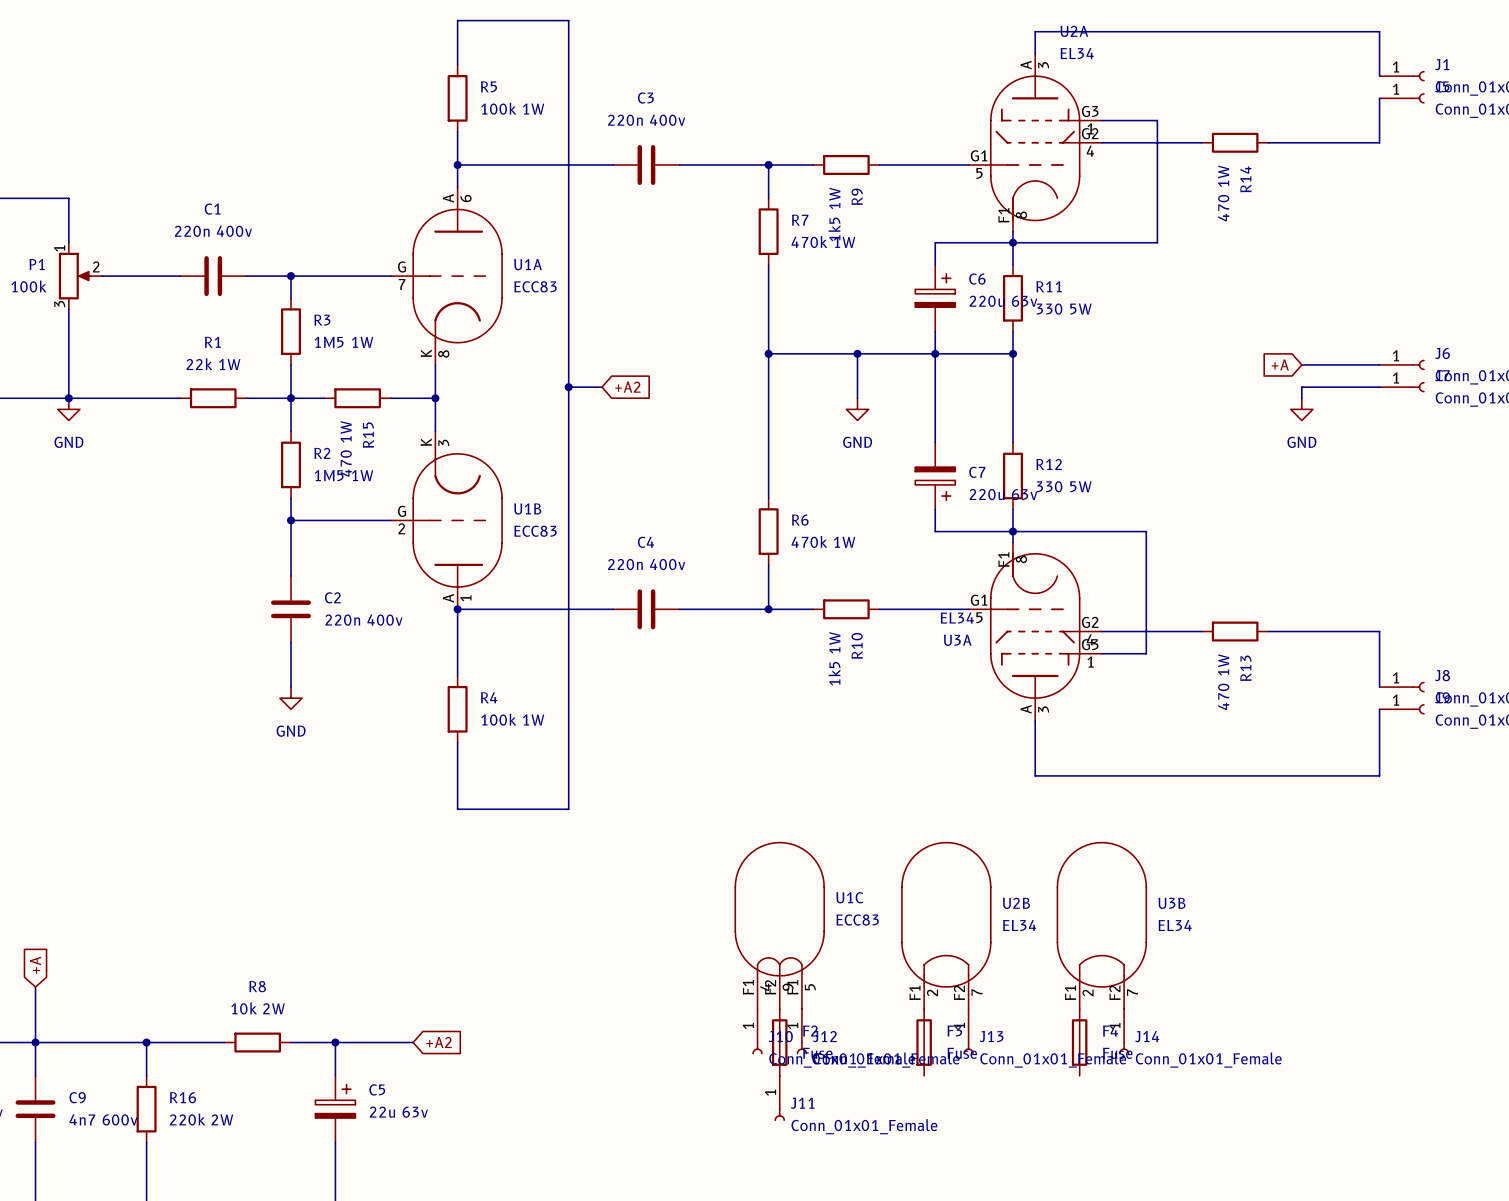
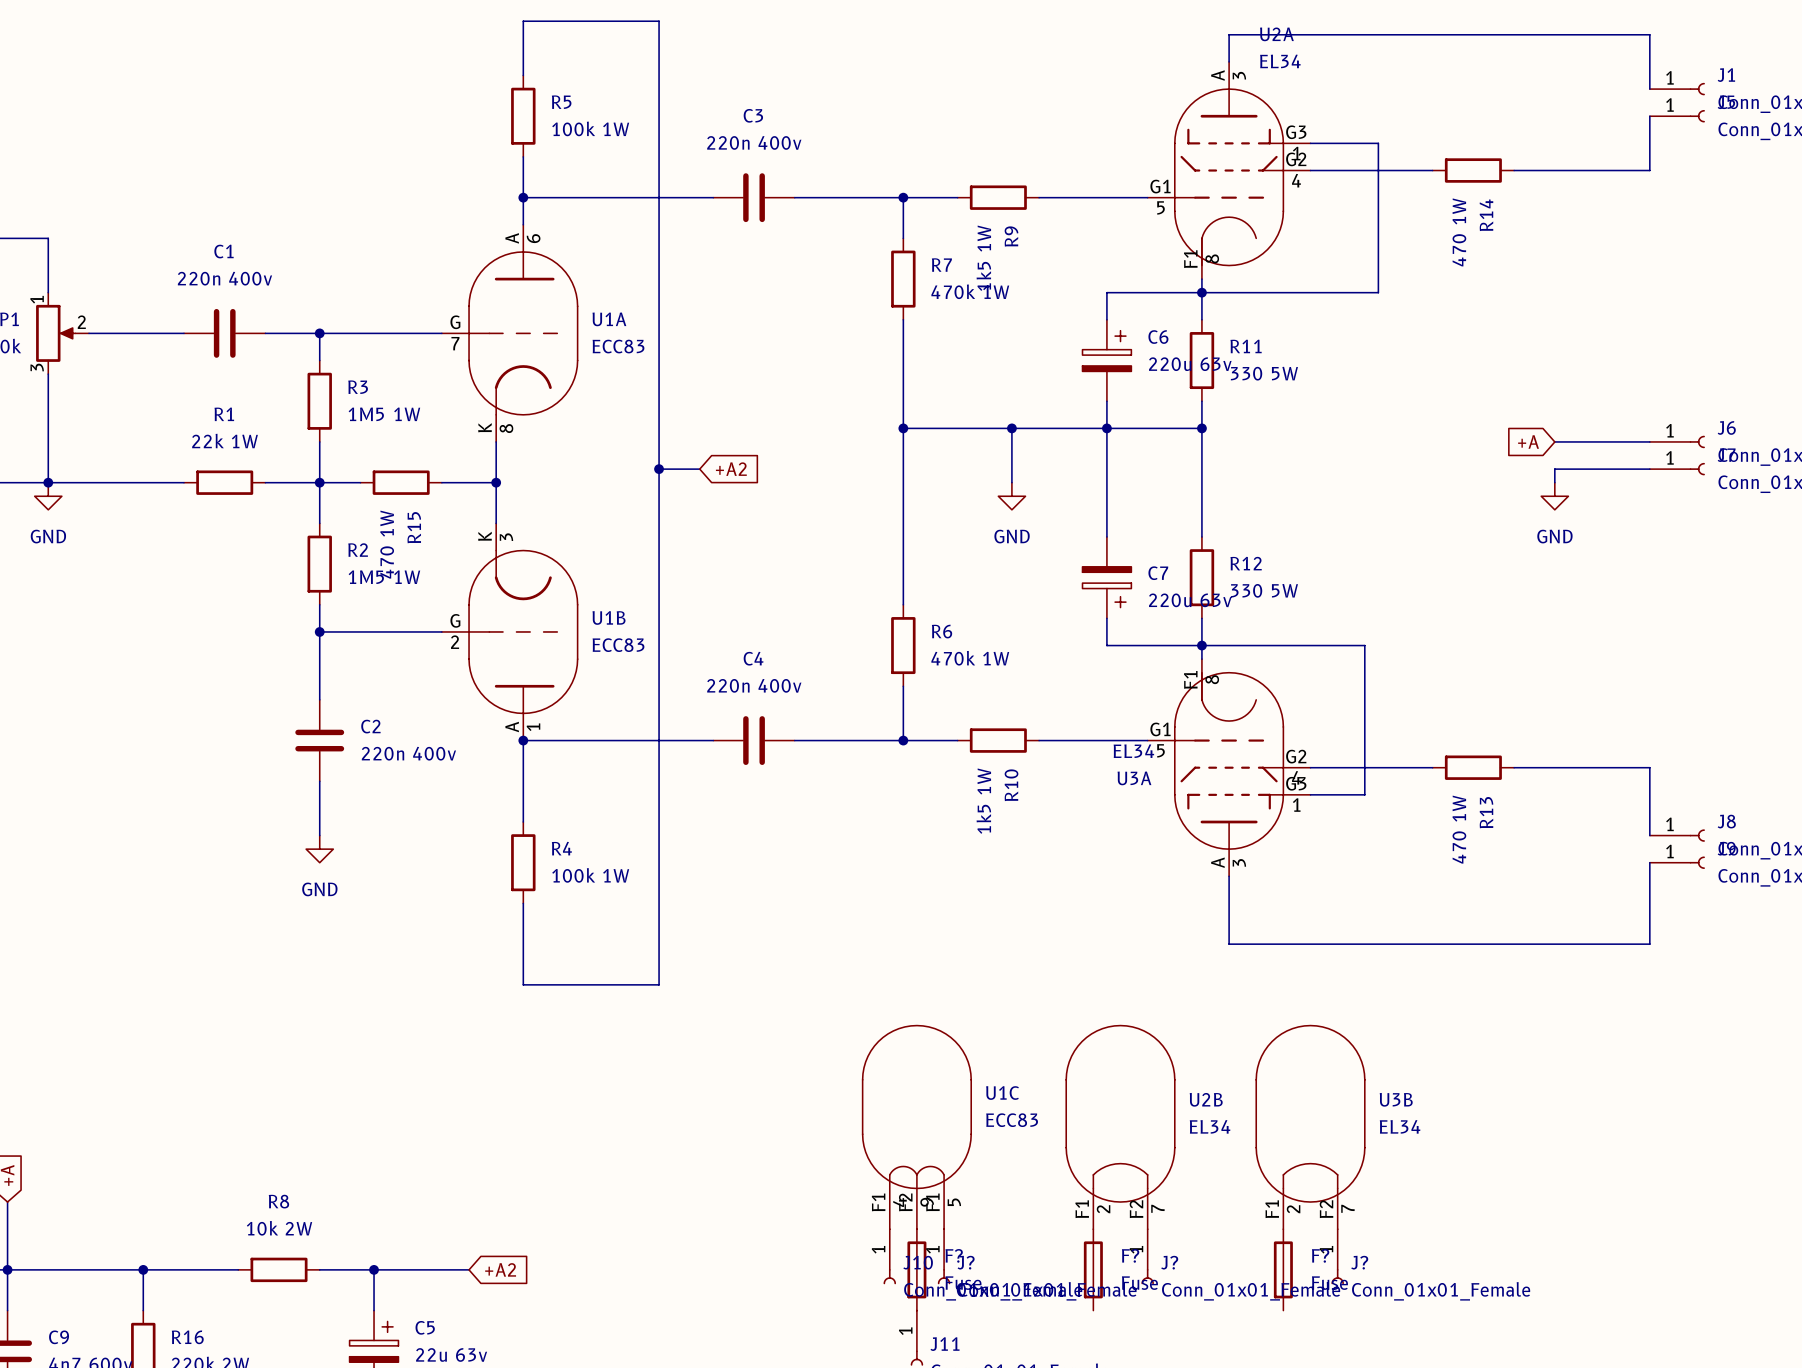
F2 name: F2 (810, 1031) -> F? (954, 1255)
F3 name: F3 (954, 1031) -> F? (1130, 1255)
F4 name: F4 (1110, 1031) -> F? (1320, 1255)
J12 name: J12 (824, 1036) -> J? (966, 1262)
J13 name: J13 (991, 1036) -> J? (1169, 1262)
J14 name: J14 (1147, 1036) -> J? (1359, 1262)

